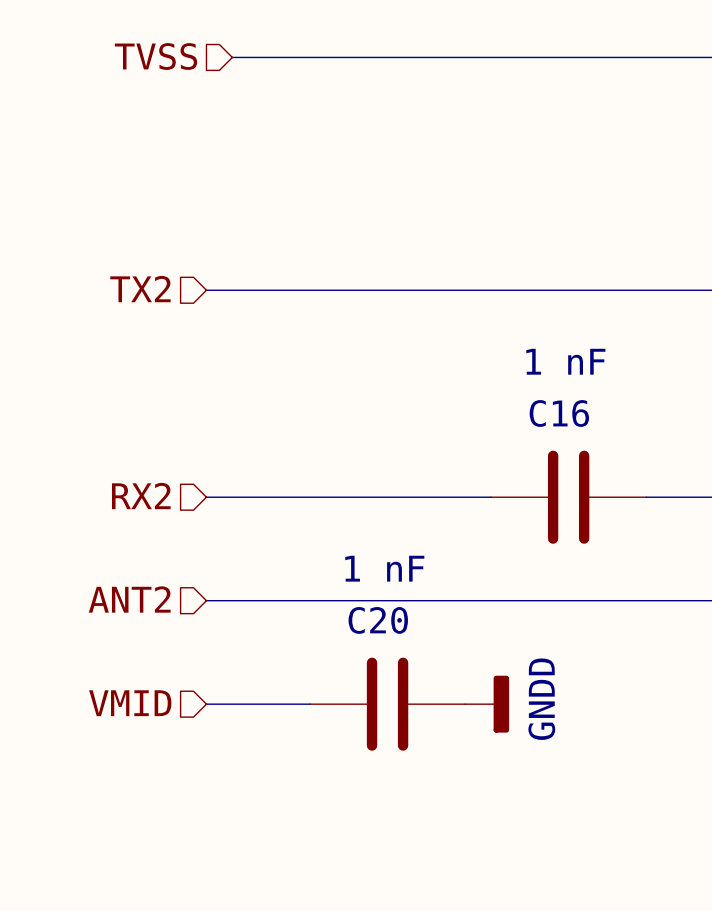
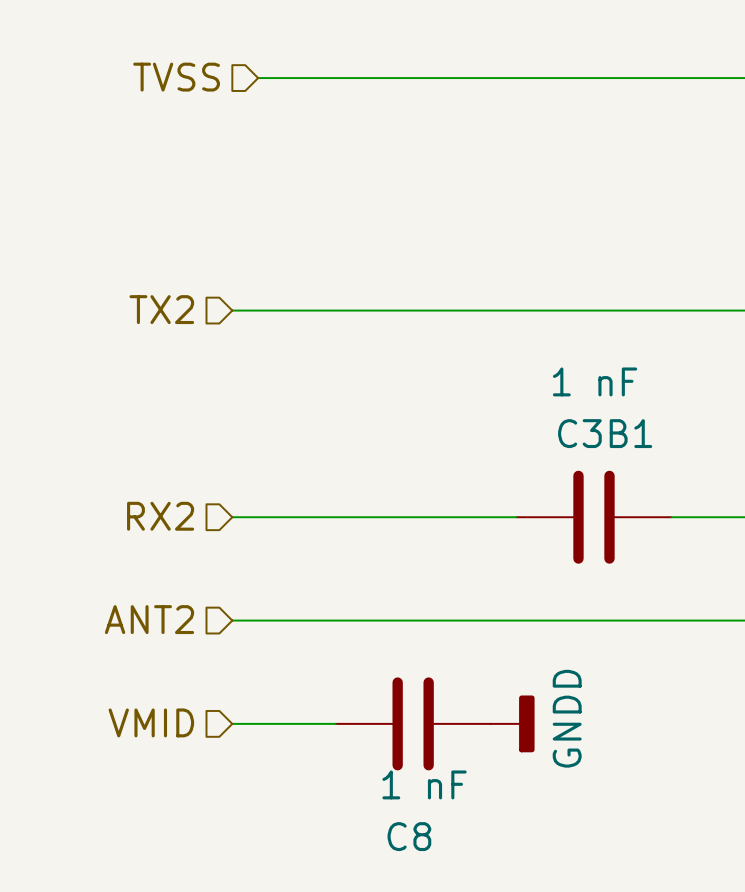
C16 name: C16 (559, 413) -> C3B1 (605, 433)
C20 value position: 1 nF (384, 568) -> 1 nF (424, 784)
C20 name: C20 (378, 620) -> C8 (409, 836)

